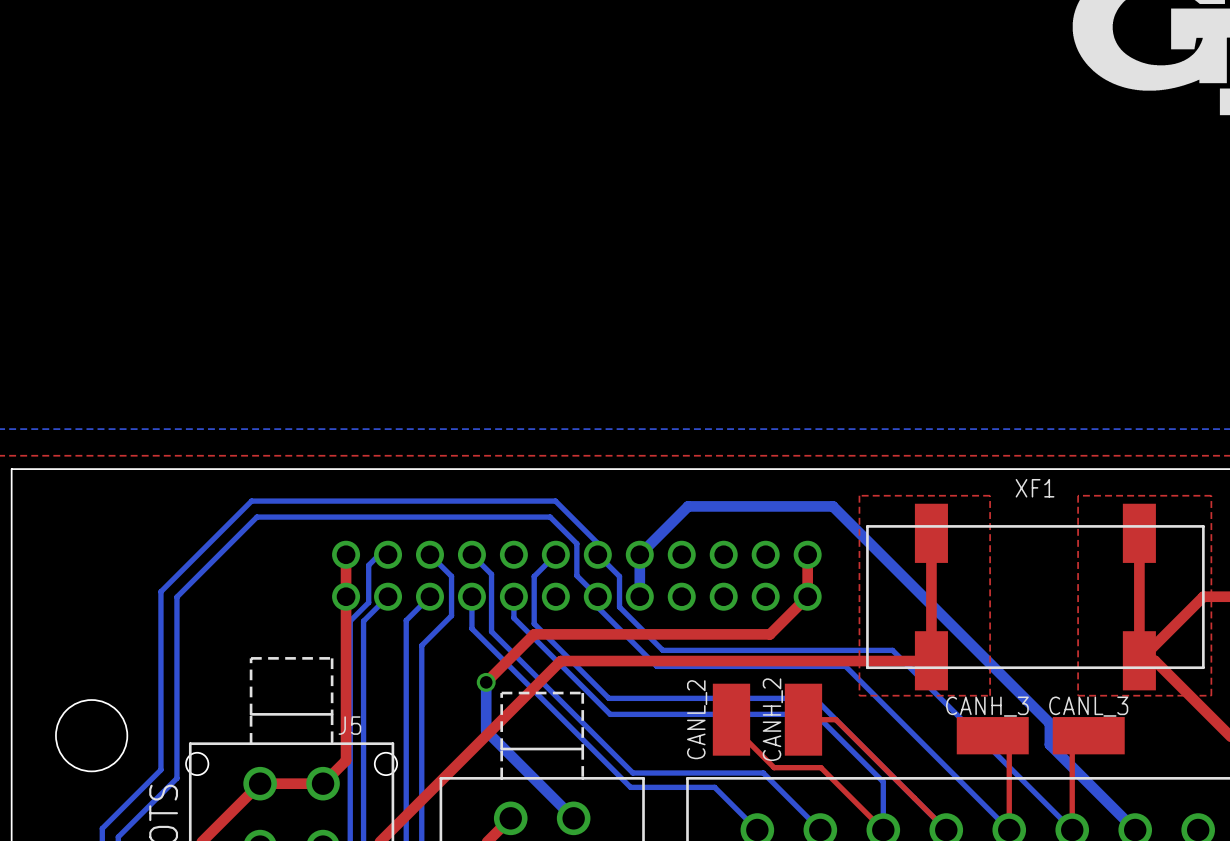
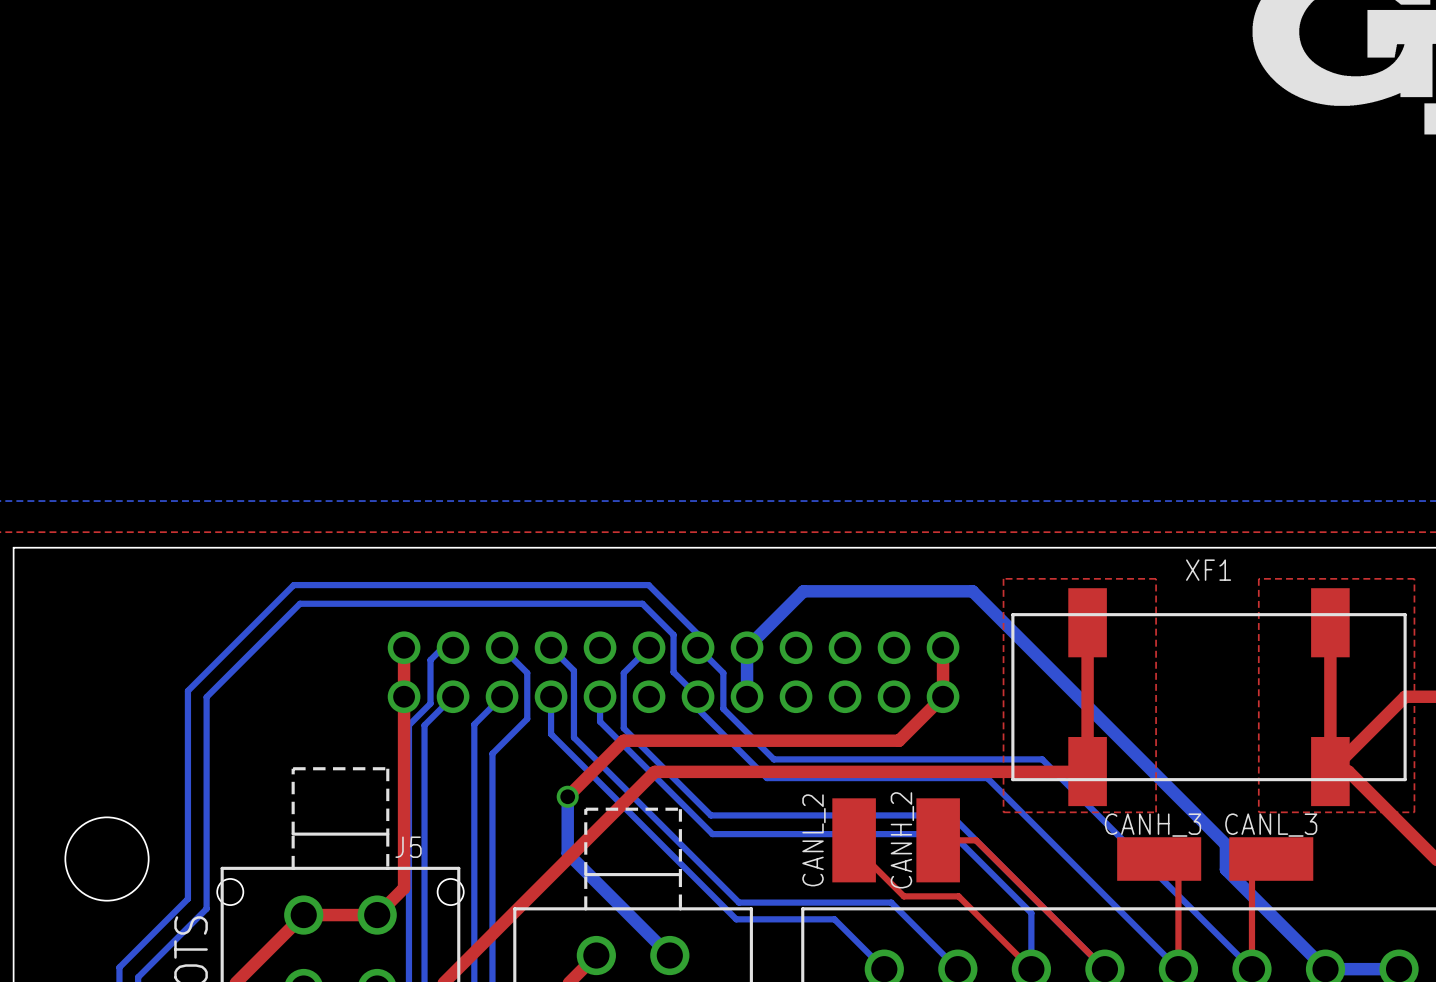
bottom track: none -> (1325, 969) (1399, 969)

